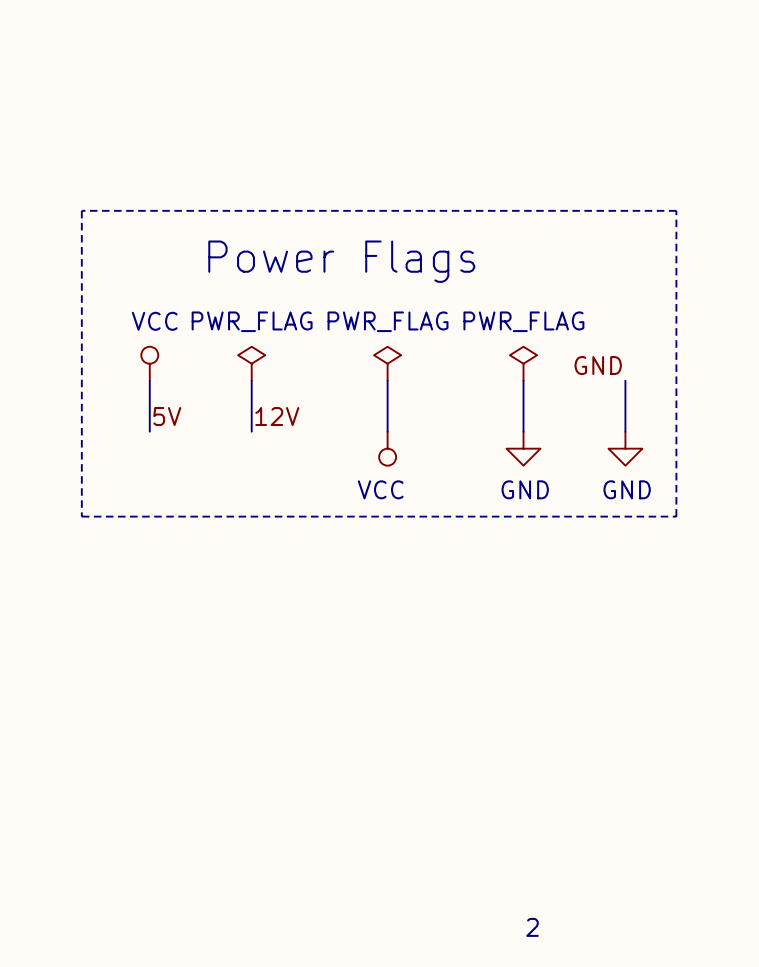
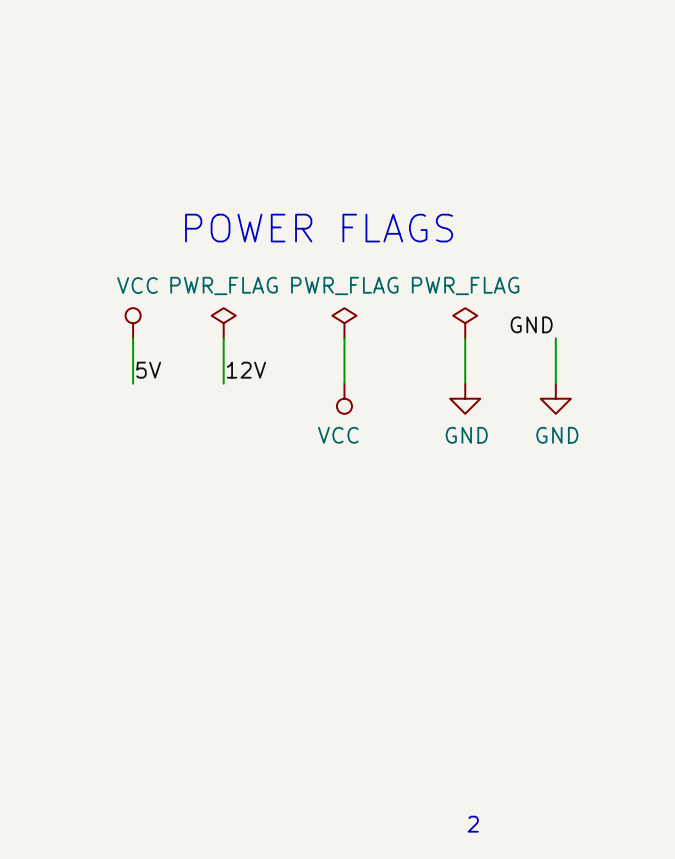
line: (81, 210) (81, 516) (676, 516) (676, 210) (81, 210) -> none
text: Power Flags (341, 261) -> POWER FLAGS (319, 228)

